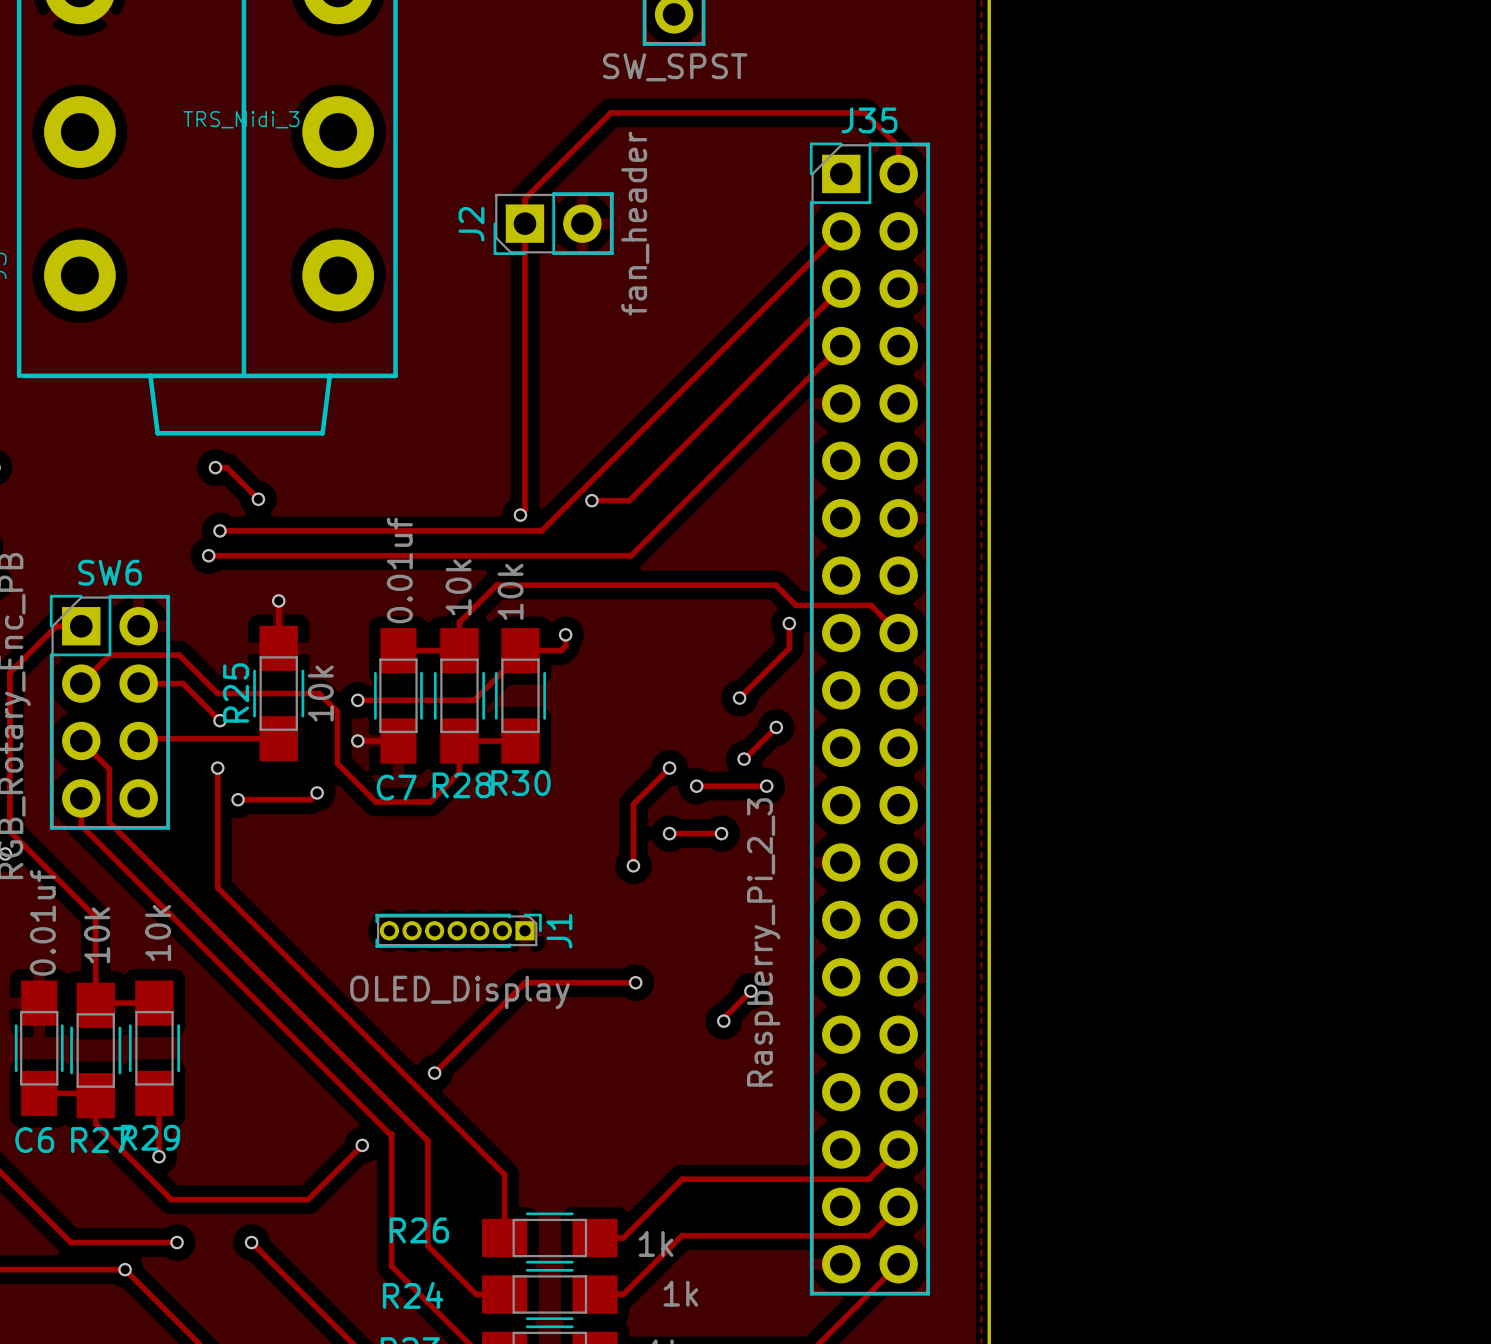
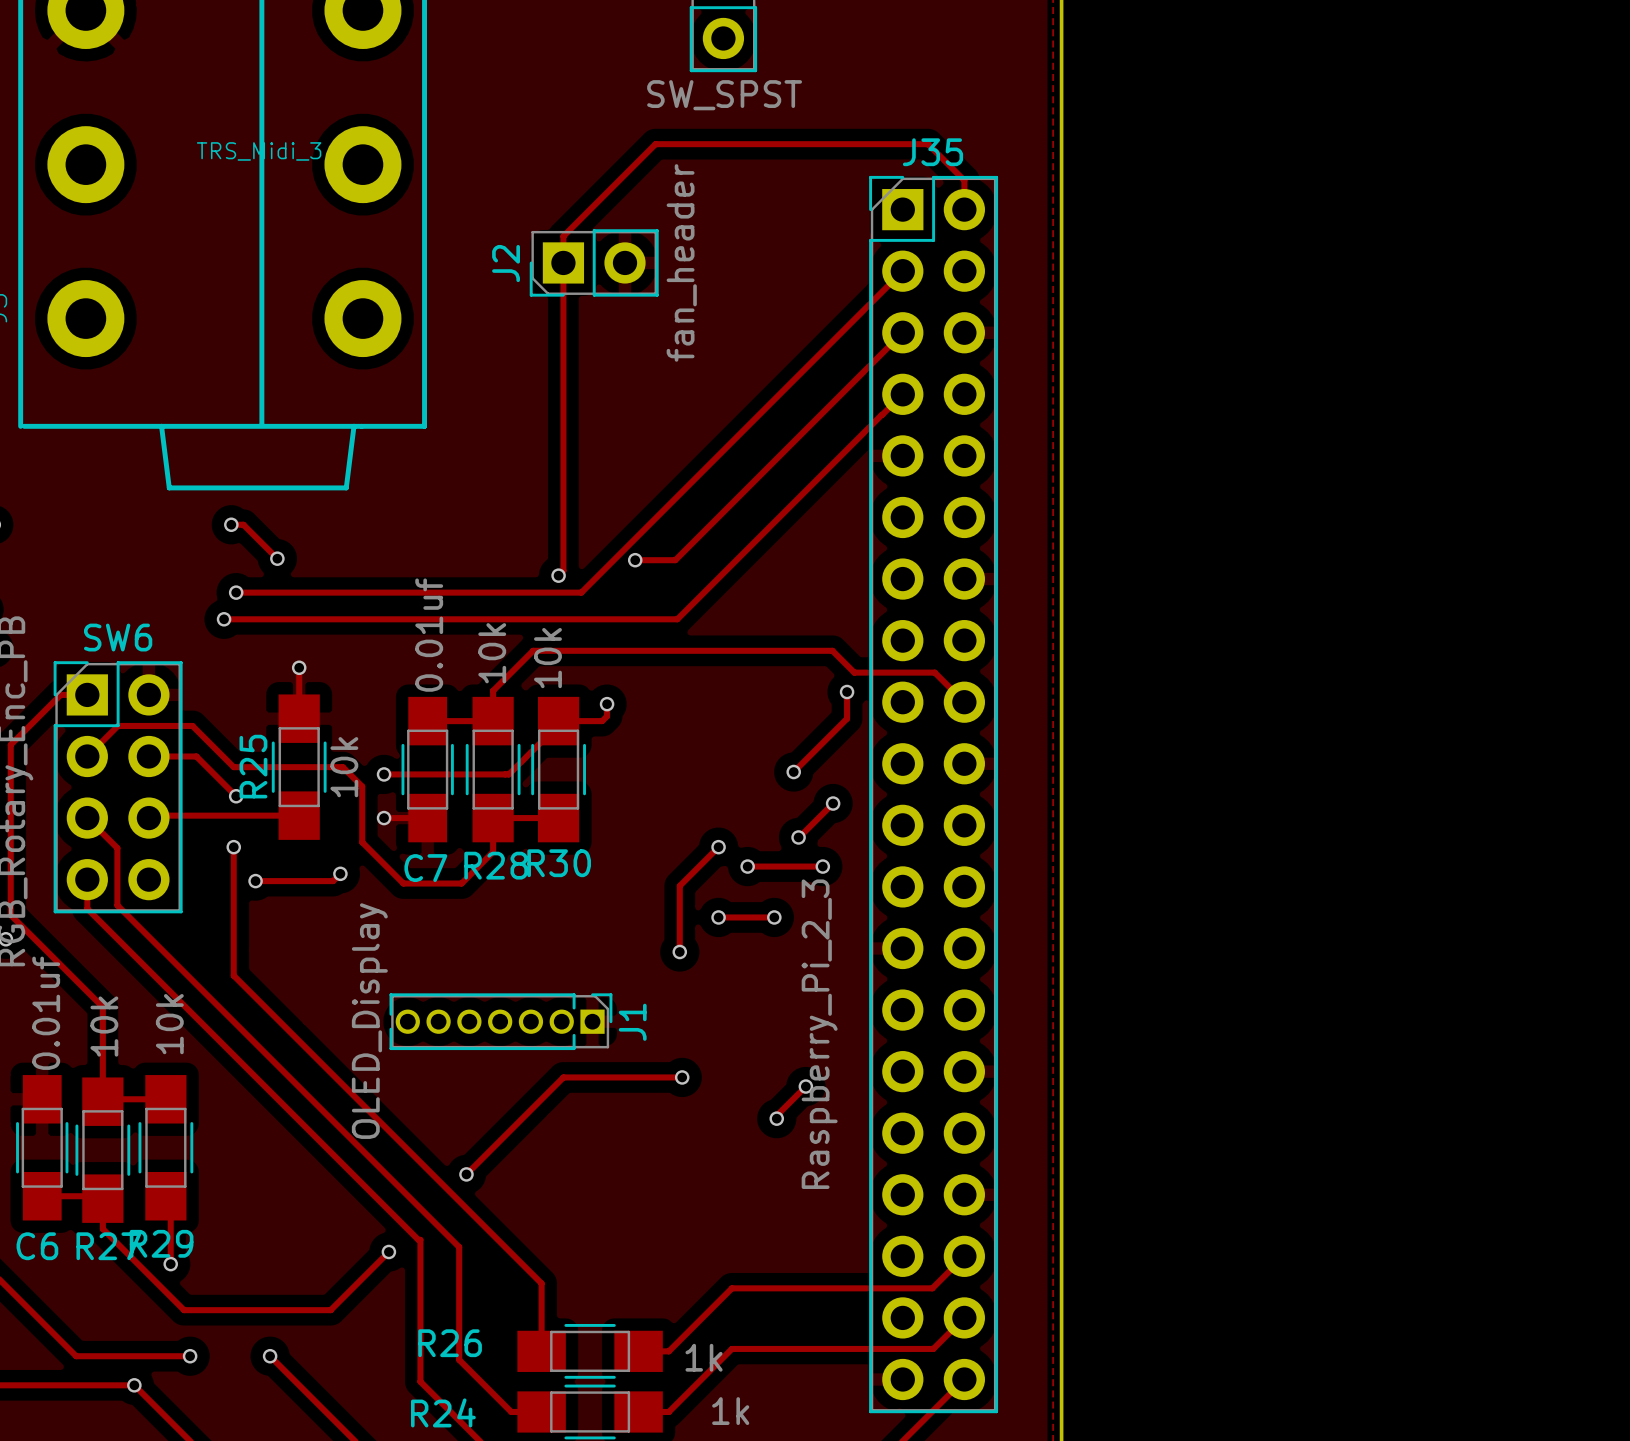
J1 footprint: [375, 913, 542, 948] -> [389, 993, 613, 1051]
J1 value position: OLED_Display (460, 992) -> OLED_Display (369, 1021)

